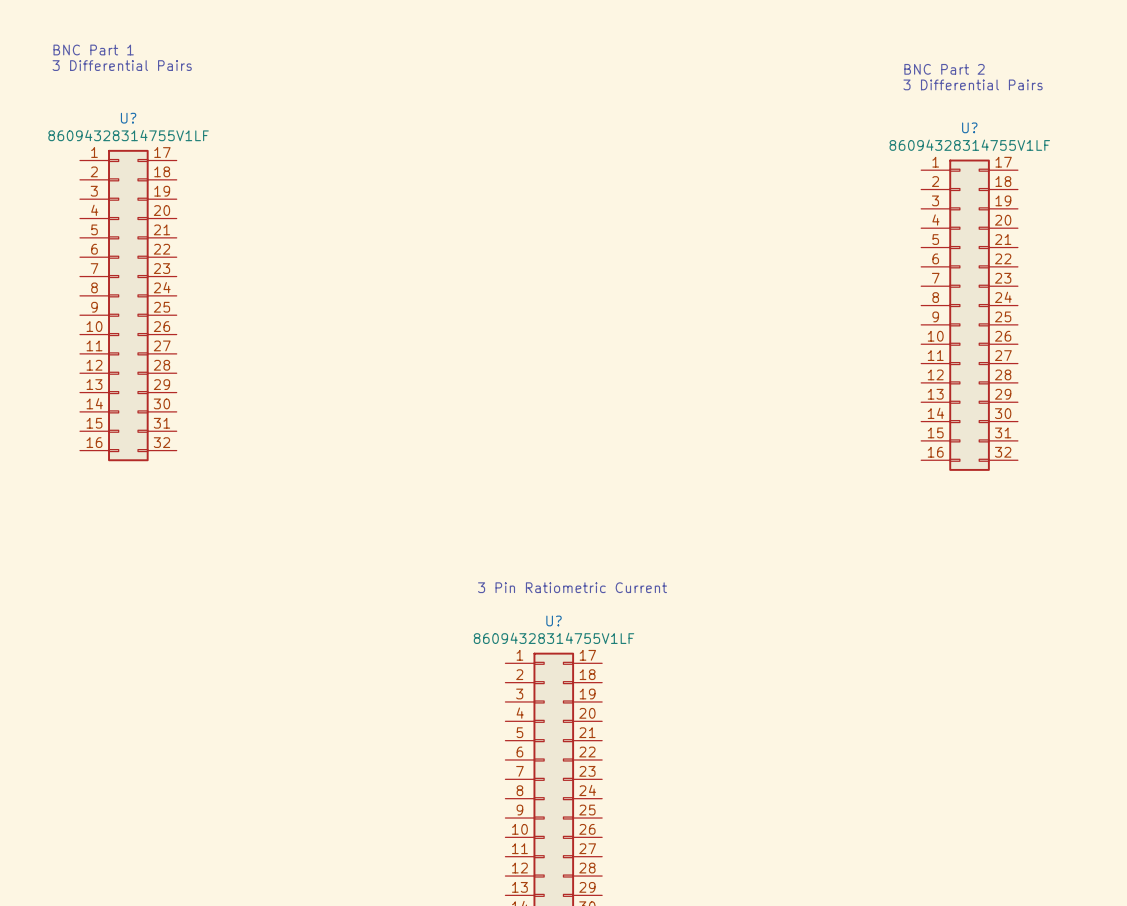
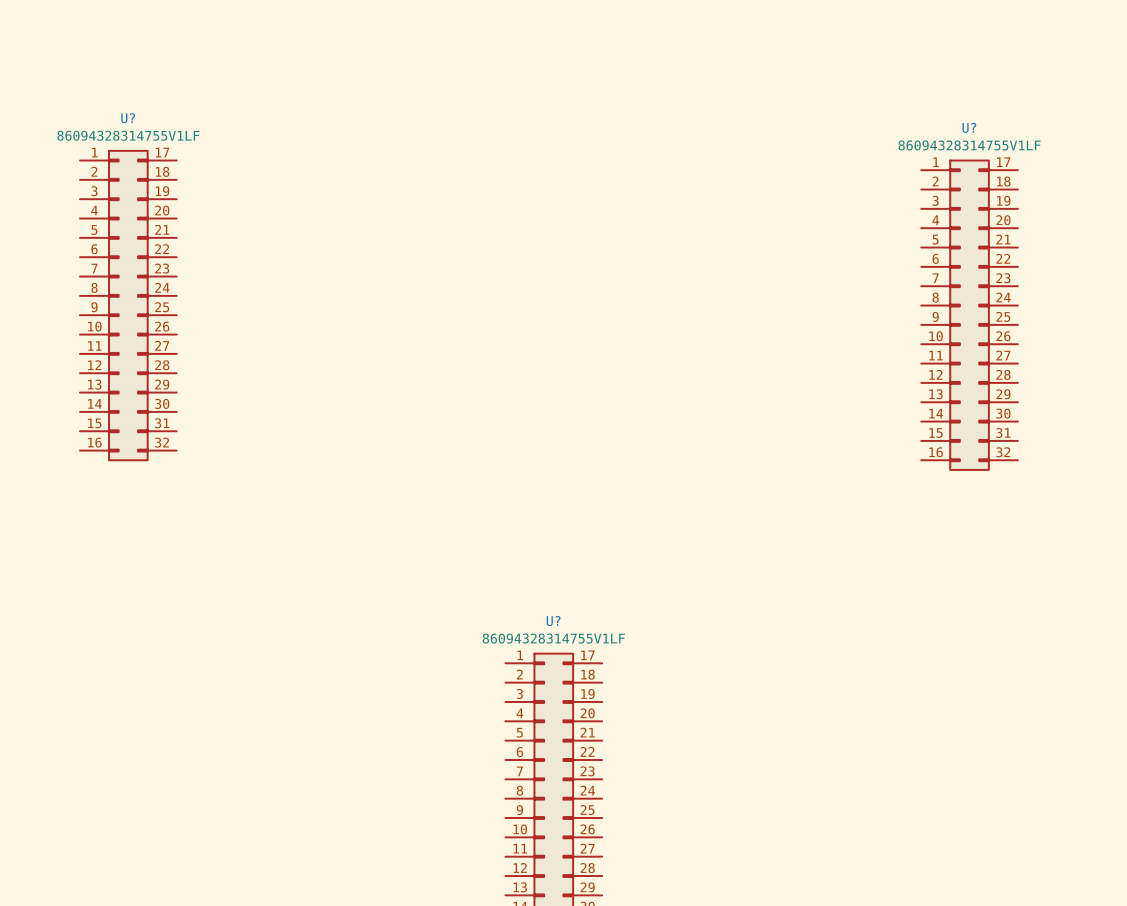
text: BNC Part 1 (93, 50) -> none
text: 3 Differential Pairs (122, 65) -> none
text: BNC Part 2 (944, 69) -> none
text: 3 Differential Pairs (973, 84) -> none
text: 3 Pin Ratiometric Current (572, 587) -> none

